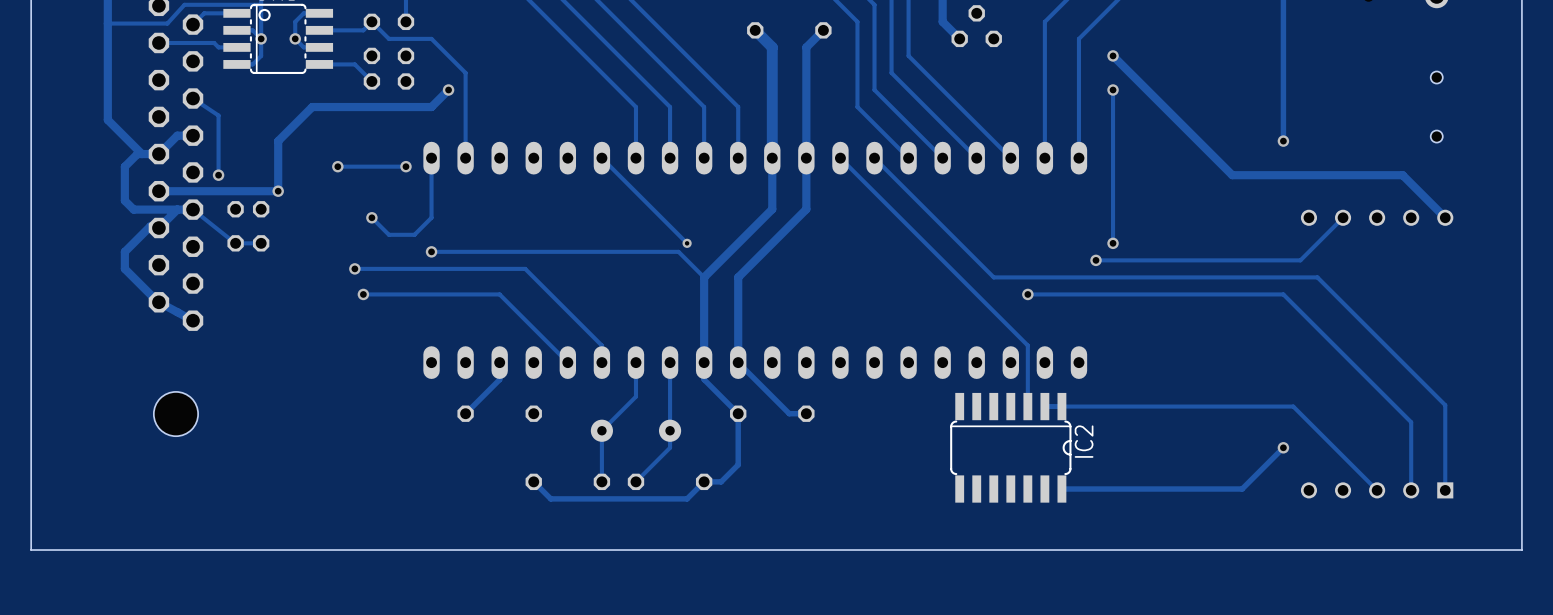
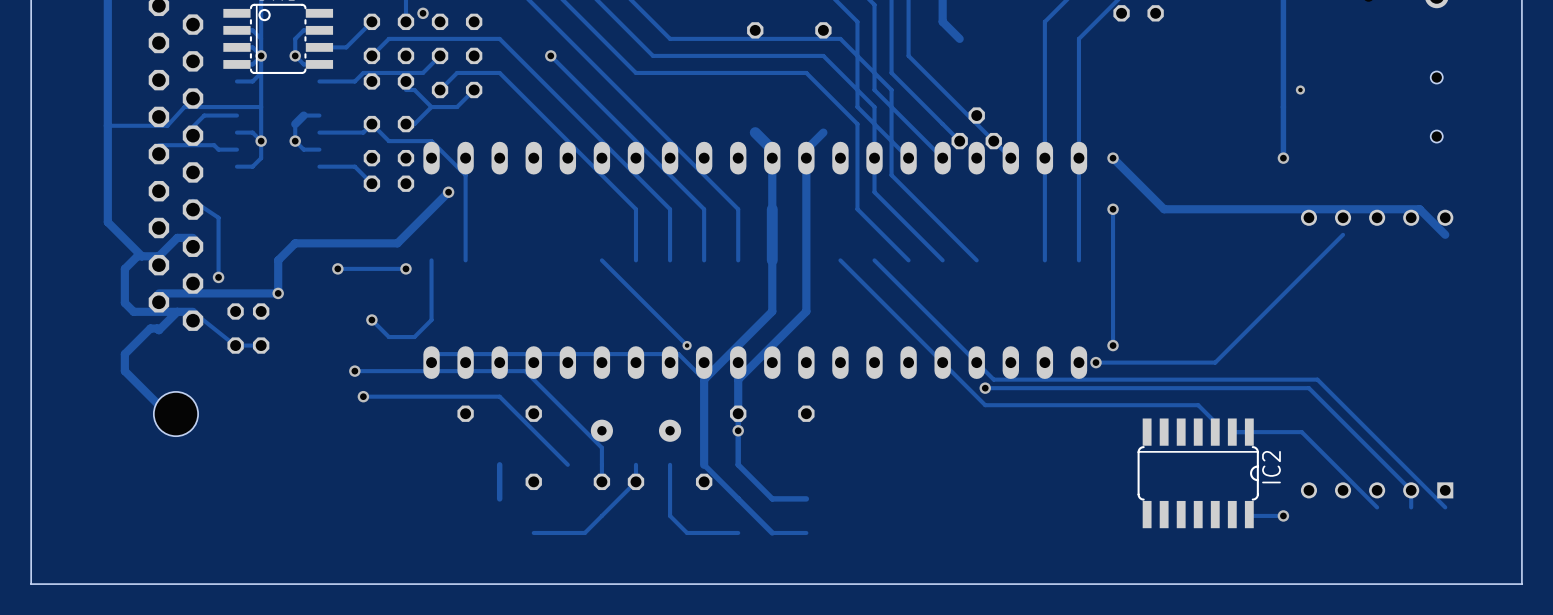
track: (261, 4) (184, 4) (167, 23) (107, 23) -> (261, 107) (184, 107) (167, 125) (107, 125)
track: (236, 13) (204, 13) (193, 24) -> (236, 115) (204, 115) (193, 126)
track: (319, 13) (303, 13) (295, 21) (295, 38) (303, 47) (319, 47) -> none
via: none -> (423, 13)
part: none -> (1138, 13)
track: (371, 21) (388, 38) -> (371, 55) (388, 38)
part: none -> (457, 21)
part position: (976, 26) -> (976, 128)
track: (363, 30) (319, 30) -> (363, 30) (346, 47) (319, 47)
track: (755, 30) (772, 47) (772, 149) -> (755, 132) (772, 149)
track: (823, 30) (806, 47) (806, 149) -> (823, 132) (806, 149)
via position: (261, 38) -> (261, 55)
via position: (295, 38) -> (295, 55)
track: (431, 38) (465, 72) (465, 158) -> (431, 38) (499, 38) (670, 209) (670, 260)
track: (670, 38) (738, 107) (738, 158) -> (670, 38) (840, 38) (891, 90) (891, 175)
track: (158, 42) (214, 42) (218, 47) (236, 47) -> (236, 166) (252, 166) (261, 158) (261, 55) (252, 47) (236, 47)
track: none -> (440, 55) (423, 72) (363, 72) (354, 81) (319, 81)
part: none -> (457, 55)
track: none -> (550, 55) (704, 209) (704, 260)
via: none -> (550, 55)
track: (653, 55) (704, 107) (704, 158) -> (653, 55) (823, 55) (874, 107) (874, 192)
track: (1113, 55) (1232, 175) (1402, 175) (1445, 217) -> none
via: (1113, 55) -> none
track: (319, 64) (354, 64) (371, 81) -> (319, 64) (303, 64) (295, 55) (295, 38) (303, 30) (319, 30)
track: none -> (261, 72) (252, 81) (236, 81)
track: (635, 72) (670, 107) (670, 158) -> (635, 72) (806, 72) (857, 124) (857, 209) (908, 260)
track: none -> (405, 90) (414, 90) (431, 107)
track: none -> (440, 90) (457, 72) (499, 72) (635, 209) (635, 260)
track: (448, 90) (431, 107) (312, 107) (303, 115) -> (319, 115) (303, 115)
via: (448, 90) -> none
part: none -> (457, 90)
track: none -> (474, 90) (457, 107) (431, 107)
track: (1113, 90) (1113, 209) -> none
via: (1113, 90) -> none
via: none -> (1300, 90)
track: (193, 98) (218, 115) (218, 175) -> (193, 200) (218, 217) (218, 277)
track: none -> (431, 107) (414, 124) (405, 124)
track: (635, 107) (635, 158) -> (635, 107) (738, 209) (738, 260)
track: (107, 119) (141, 154) -> (107, 119) (107, 222) (141, 256)
track: (295, 124) (278, 141) (278, 191) (158, 191) -> (295, 124) (295, 141) (303, 149) (319, 149)
part: none -> (388, 124)
track: none -> (236, 132) (252, 132) (261, 141)
track: none -> (319, 132) (363, 132) (371, 124) (388, 141) (431, 141) (465, 175) (465, 260)
track: (193, 135) (177, 135) (158, 154) (137, 154) (124, 166) (124, 200) (133, 209) (193, 209) (235, 243) (261, 243) -> (193, 237) (177, 237) (158, 256) (137, 256) (124, 268) (124, 302) (133, 311) (193, 311) (235, 345) (261, 345)
via: none -> (261, 141)
via: none -> (295, 141)
track: (959, 141) (976, 158) -> none
track: none -> (1283, 141) (1283, 158)
via position: (1283, 141) -> (1283, 158)
track: none -> (158, 145) (214, 145) (218, 149) (236, 149)
part: none -> (388, 158)
track: (431, 158) (431, 217) (414, 234) (388, 234) (371, 217) -> (431, 260) (431, 320) (414, 337) (388, 337) (371, 320)
track: (601, 158) (687, 243) -> (601, 260) (687, 345)
track: (840, 158) (874, 192) -> none
track: (874, 158) (891, 175) -> none
track: none -> (1044, 158) (1044, 260)
track: none -> (1078, 158) (1078, 260)
track: none -> (1113, 158) (1164, 209) (1419, 209) (1445, 234)
via: none -> (1113, 158)
track: none -> (337, 166) (319, 166)
via: (337, 166) -> none
track: (405, 166) (354, 166) -> (371, 183) (354, 166)
via: (405, 166) -> none
via: (218, 175) -> none
part: none -> (388, 183)
via: (278, 191) -> none
track: none -> (448, 192) (397, 243) (295, 243) (278, 260) (278, 293) (158, 293)
via: none -> (448, 192)
track: (177, 209) (158, 228) (150, 226) (124, 251) (124, 268) (158, 302) (193, 320) -> (177, 311) (158, 330) (150, 328) (124, 354) (124, 371) (158, 404) (193, 422)
track: (772, 209) (704, 277) -> (772, 209) (772, 311) (704, 379)
track: (806, 209) (738, 277) (738, 362) (789, 413) (806, 413) -> (806, 209) (806, 311) (738, 379) (738, 413)
via: none -> (1113, 209)
via: (371, 217) -> none
track: (1343, 217) (1300, 260) (1096, 260) -> none
part: (235, 226) -> none
part: (261, 226) -> none
track: none -> (1343, 234) (1215, 362) (1096, 362)
via: (687, 243) -> none
track: none -> (1113, 243) (1113, 345)
via: (1113, 243) -> none
track: (431, 251) (678, 251) (704, 277) -> (431, 354) (678, 354) (704, 379)
via: (431, 251) -> none
track: none -> (840, 260) (985, 405) (1198, 405) (1215, 422) (1215, 432)
track: none -> (874, 260) (993, 379) (1317, 379) (1445, 507)
track: (942, 260) (1027, 345) (1027, 406) -> none
track: (976, 260) (993, 277) (1317, 277) (1445, 405) (1445, 490) -> none
via: (1096, 260) -> none
track: none -> (354, 268) (337, 268)
via position: (354, 268) -> (337, 268)
track: (405, 268) (525, 268) (601, 345) (601, 362) -> none
via: none -> (405, 268)
via: none -> (218, 277)
track: (704, 277) (704, 379) (738, 413) -> none
via: none -> (278, 293)
track: (363, 294) (499, 294) (567, 362) -> (363, 396) (499, 396) (567, 464)
via: (363, 294) -> none
track: (1027, 294) (1283, 294) (1411, 422) (1411, 490) -> none
via: (1027, 294) -> none
via: none -> (371, 320)
part: none -> (235, 328)
part: none -> (261, 328)
via: none -> (687, 345)
via: none -> (1113, 345)
track: (499, 362) (499, 379) (465, 413) -> none
track: (635, 362) (635, 396) (601, 430) (601, 447) -> (354, 371) (525, 371) (601, 447)
track: (670, 362) (670, 447) (635, 481) -> none
via: none -> (1096, 362)
via: none -> (354, 371)
track: none -> (704, 379) (704, 464) (772, 532) (806, 532)
track: none -> (985, 388) (1308, 388) (1411, 490) (1411, 507)
via: none -> (985, 388)
via: none -> (363, 396)
track: (1044, 406) (1293, 406) (1377, 490) -> none
via: none -> (738, 430)
track: none -> (1232, 432) (1301, 432) (1377, 507)
IC2 position: (1010, 447) -> (1198, 473)
track: (1283, 447) (1242, 489) (1061, 489) -> none
via position: (1283, 447) -> (1283, 515)
track: none -> (499, 464) (499, 498)
track: none -> (635, 464) (635, 481) (584, 532) (533, 532)
track: none -> (670, 464) (670, 515) (687, 532) (738, 532)
track: (738, 464) (721, 481) (704, 481) (687, 498) (550, 498) (533, 481) -> (738, 464) (772, 498) (806, 498)
track: none -> (1249, 514) (1283, 515)
board edge: (1521, 550) (31, 550) -> (1521, 550) (1521, 584) (31, 584) (31, 550)

